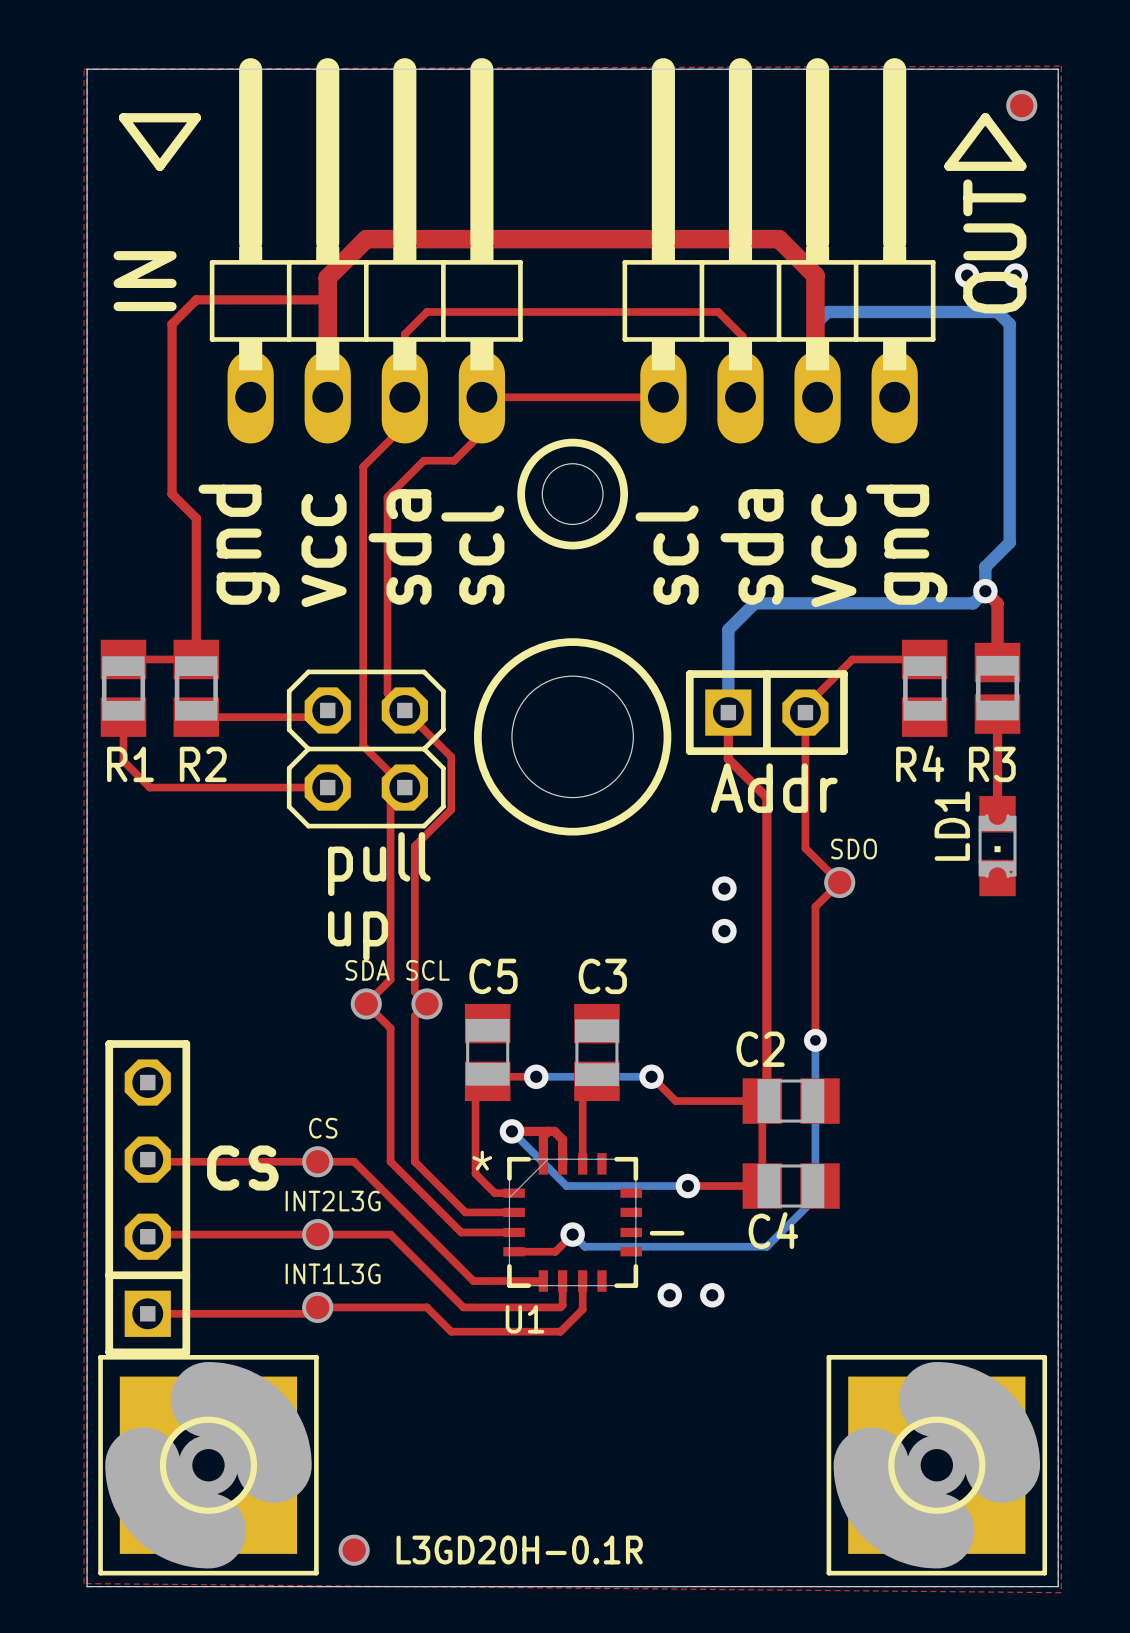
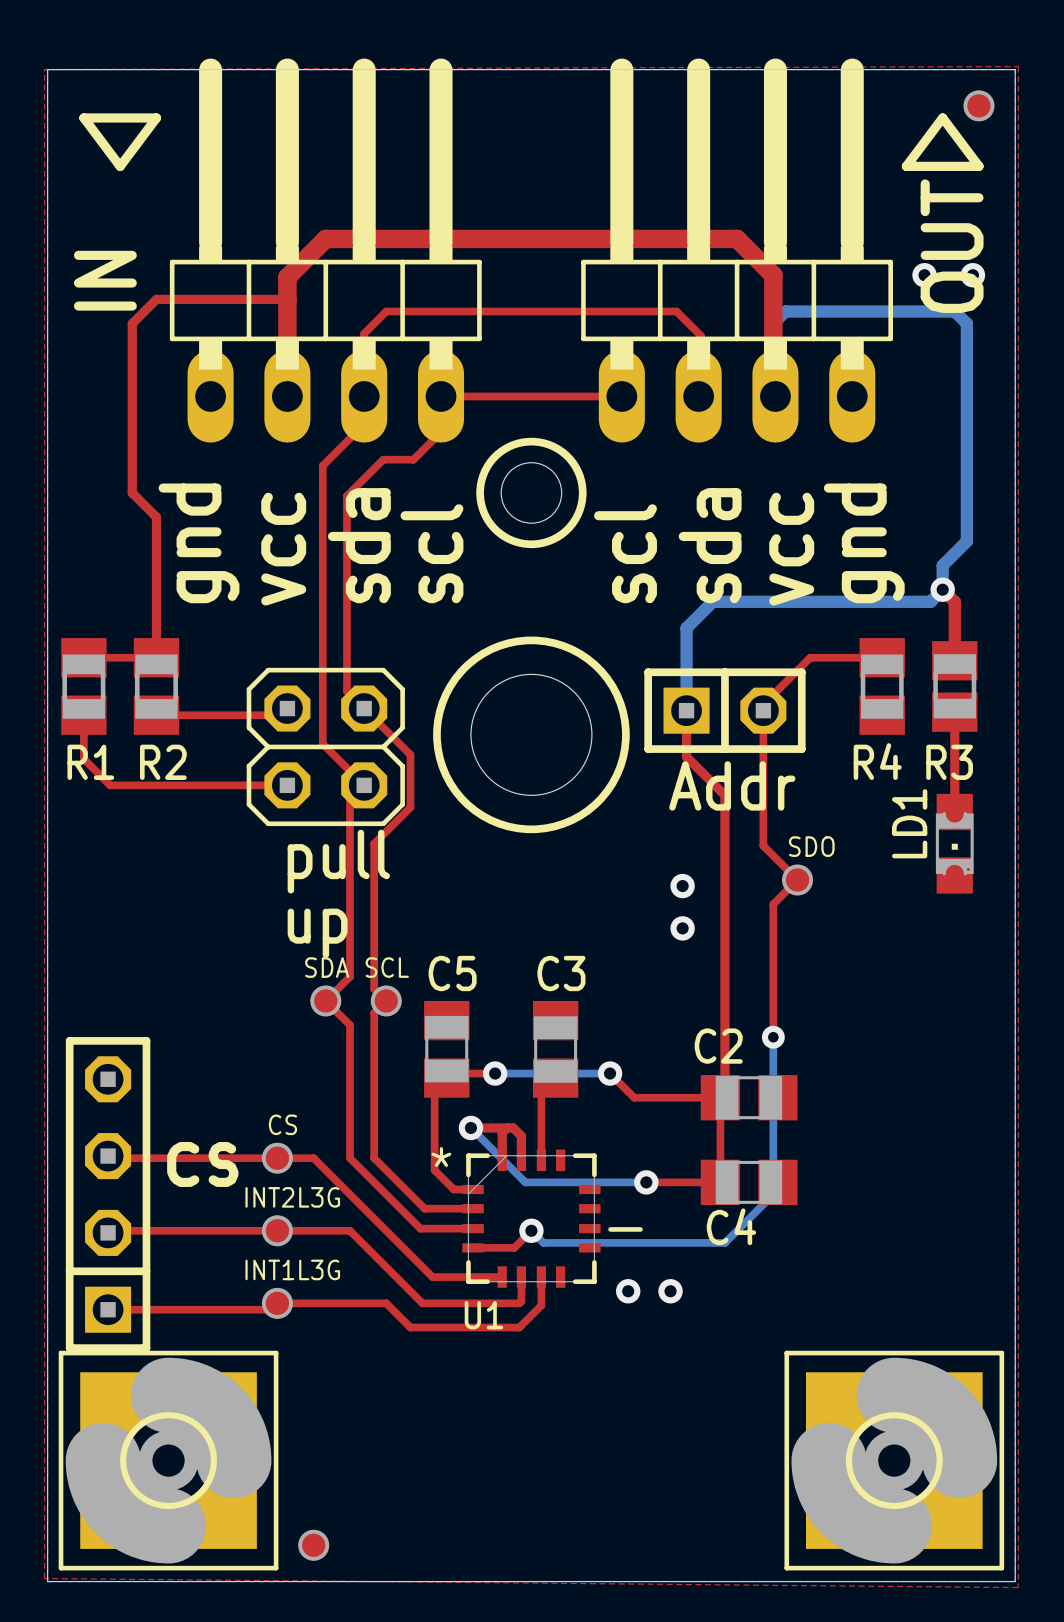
text: L3GD20H-0.1R (519, 1550) -> none

